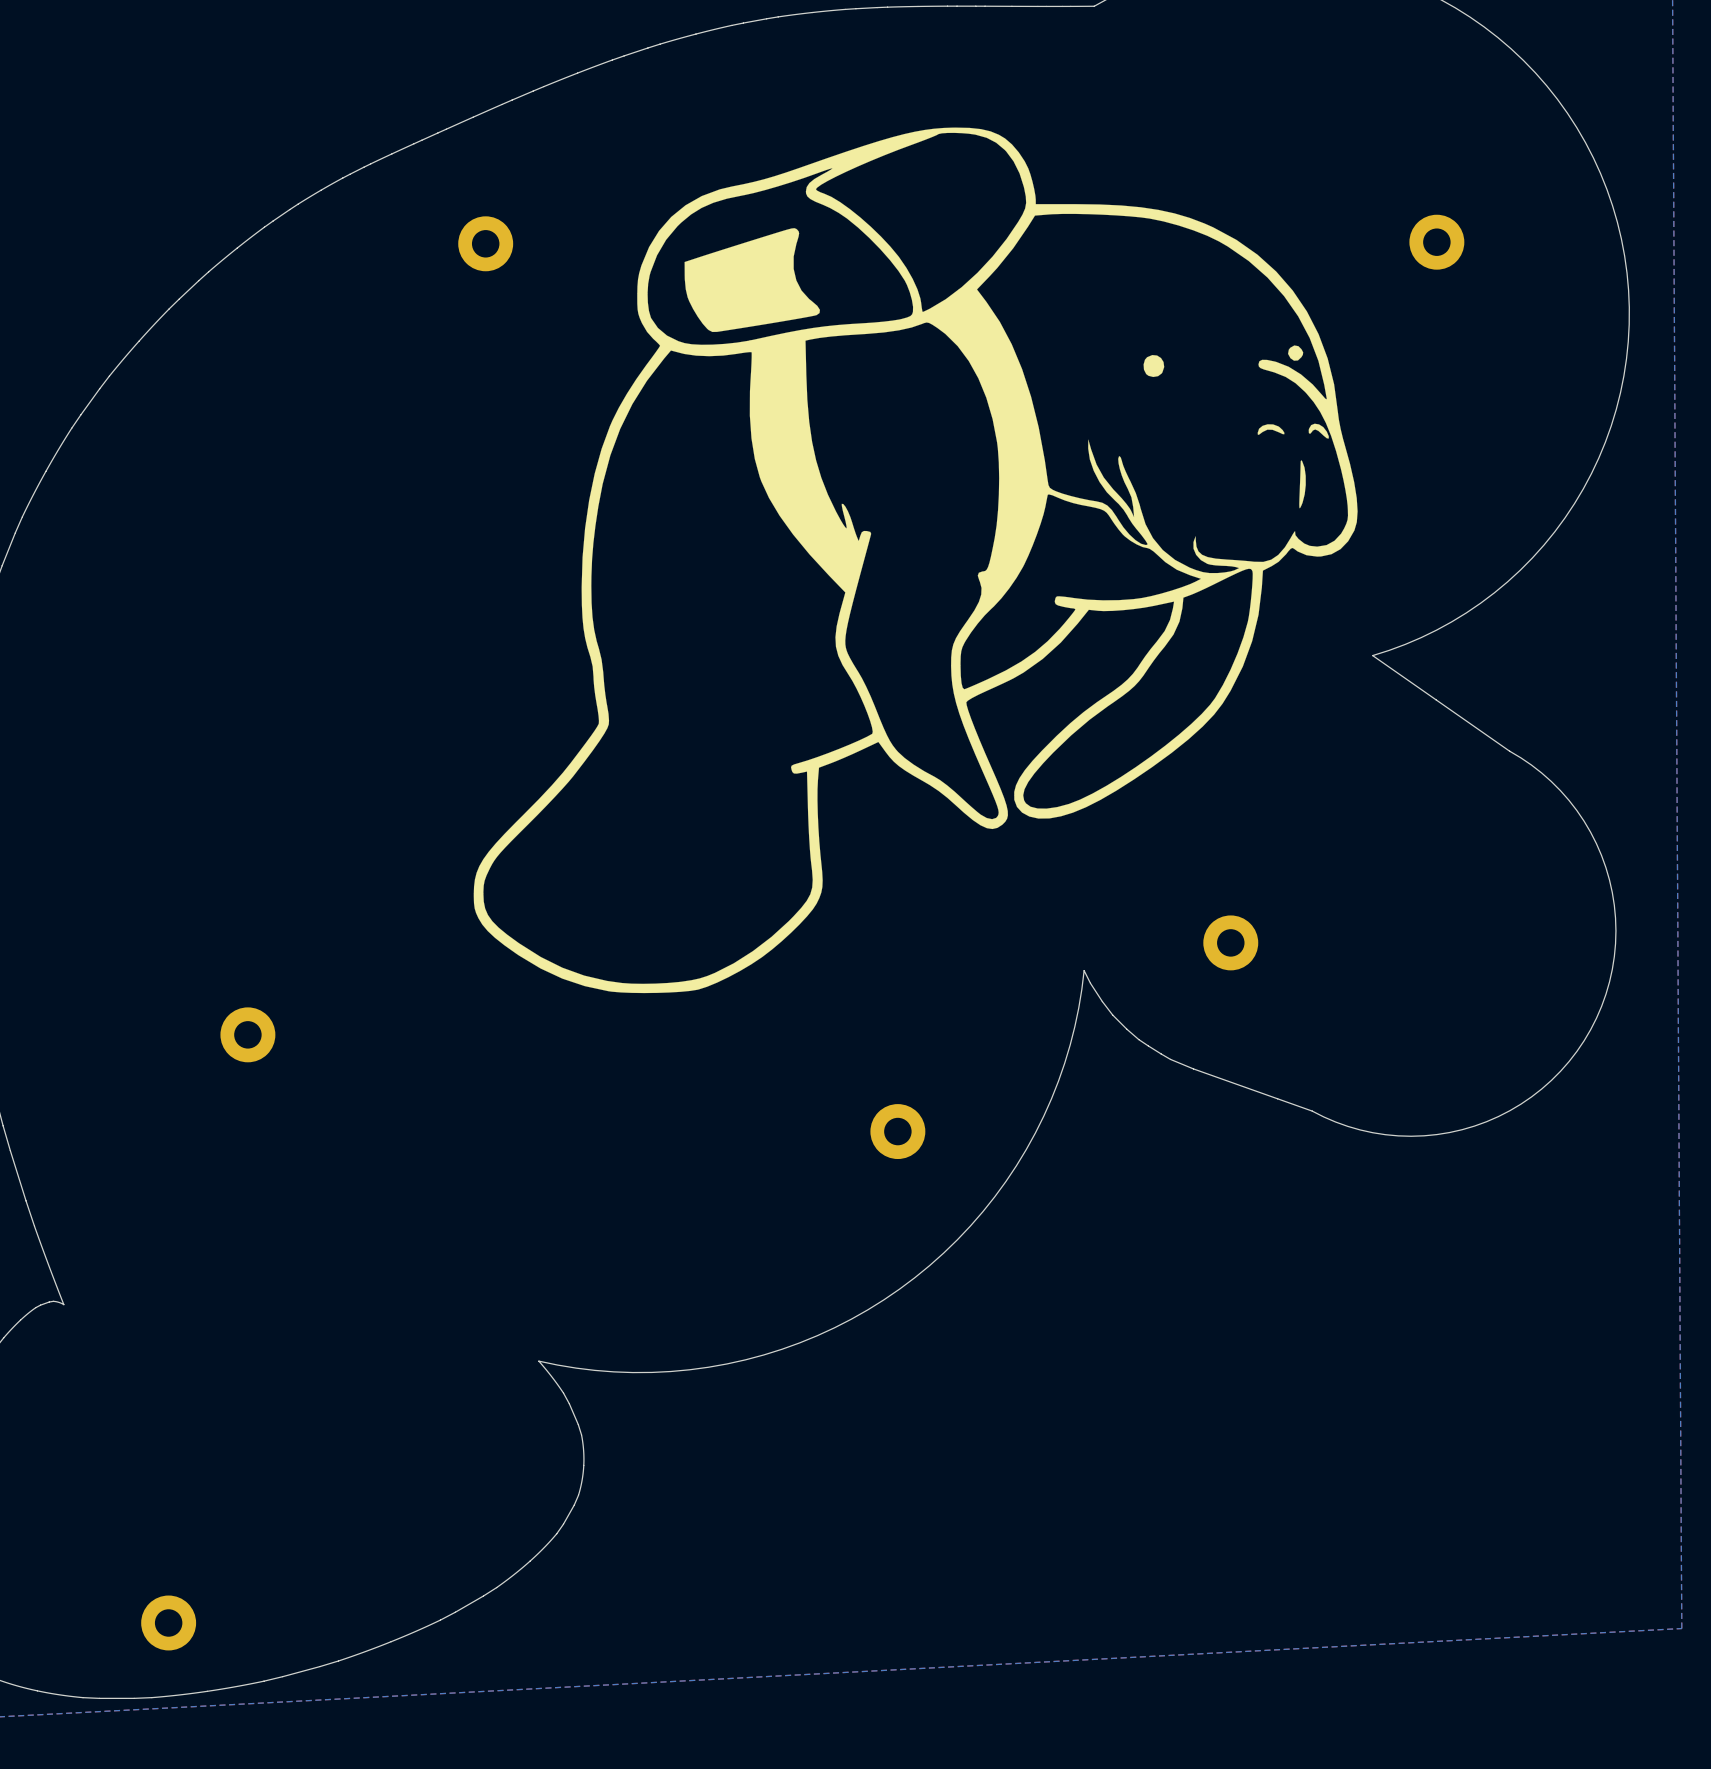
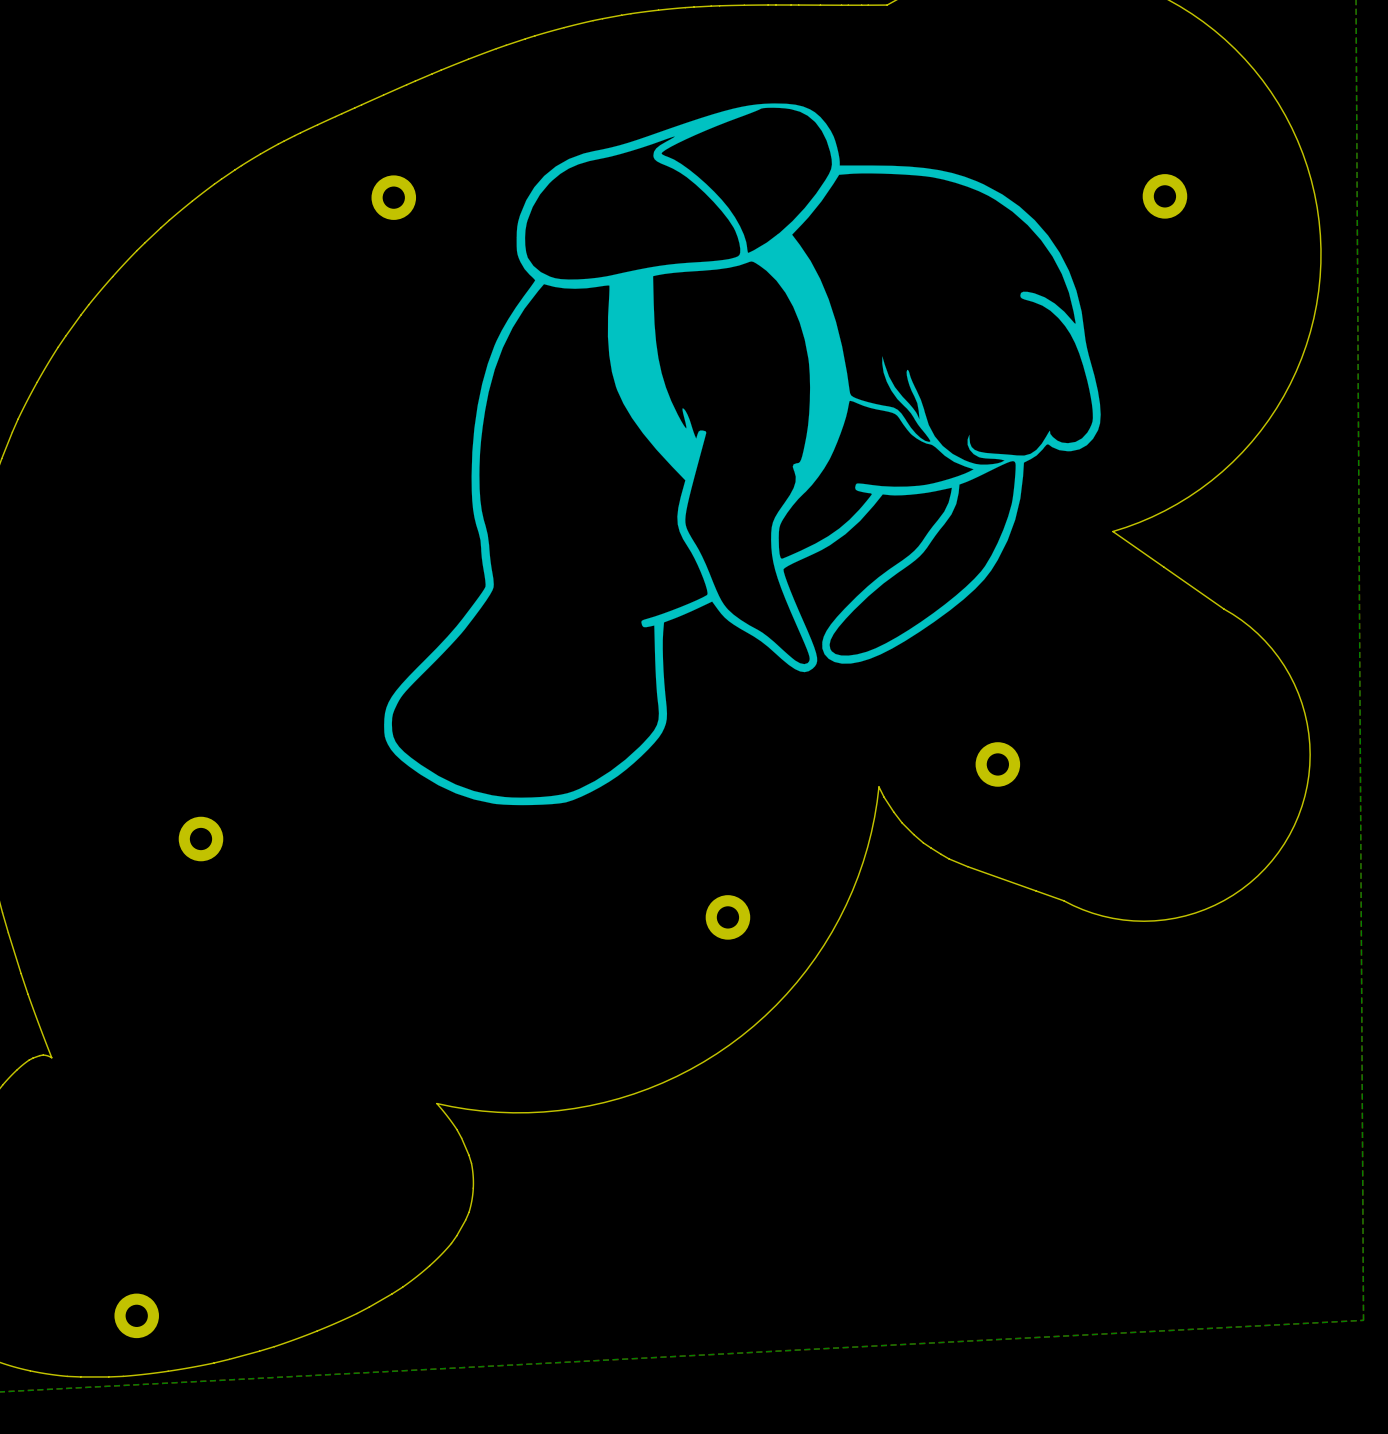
drawing shape: [473, 127, 1358, 994] -> [384, 103, 1101, 806]

